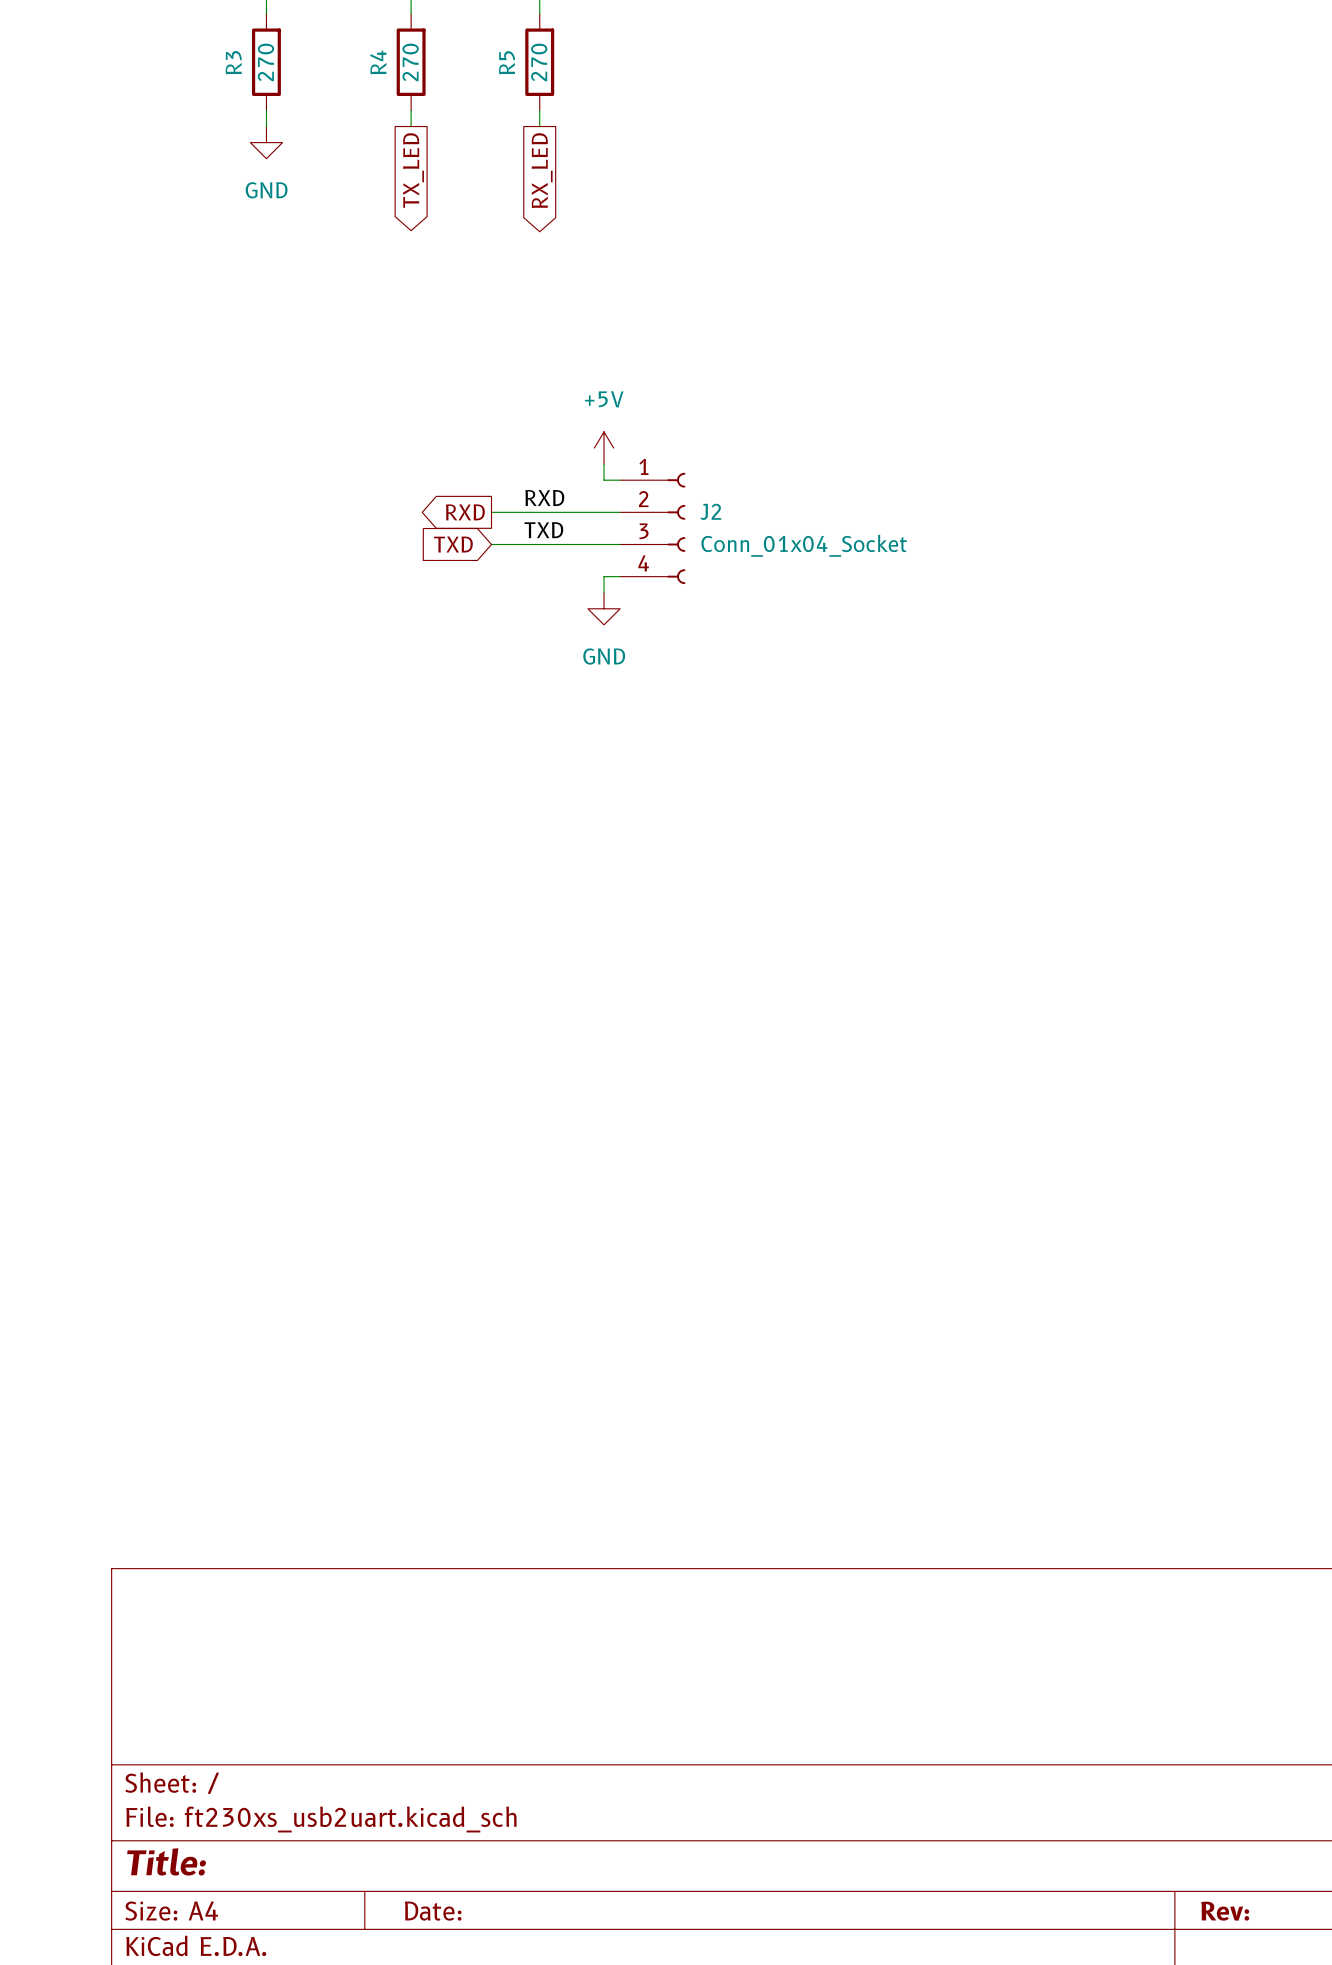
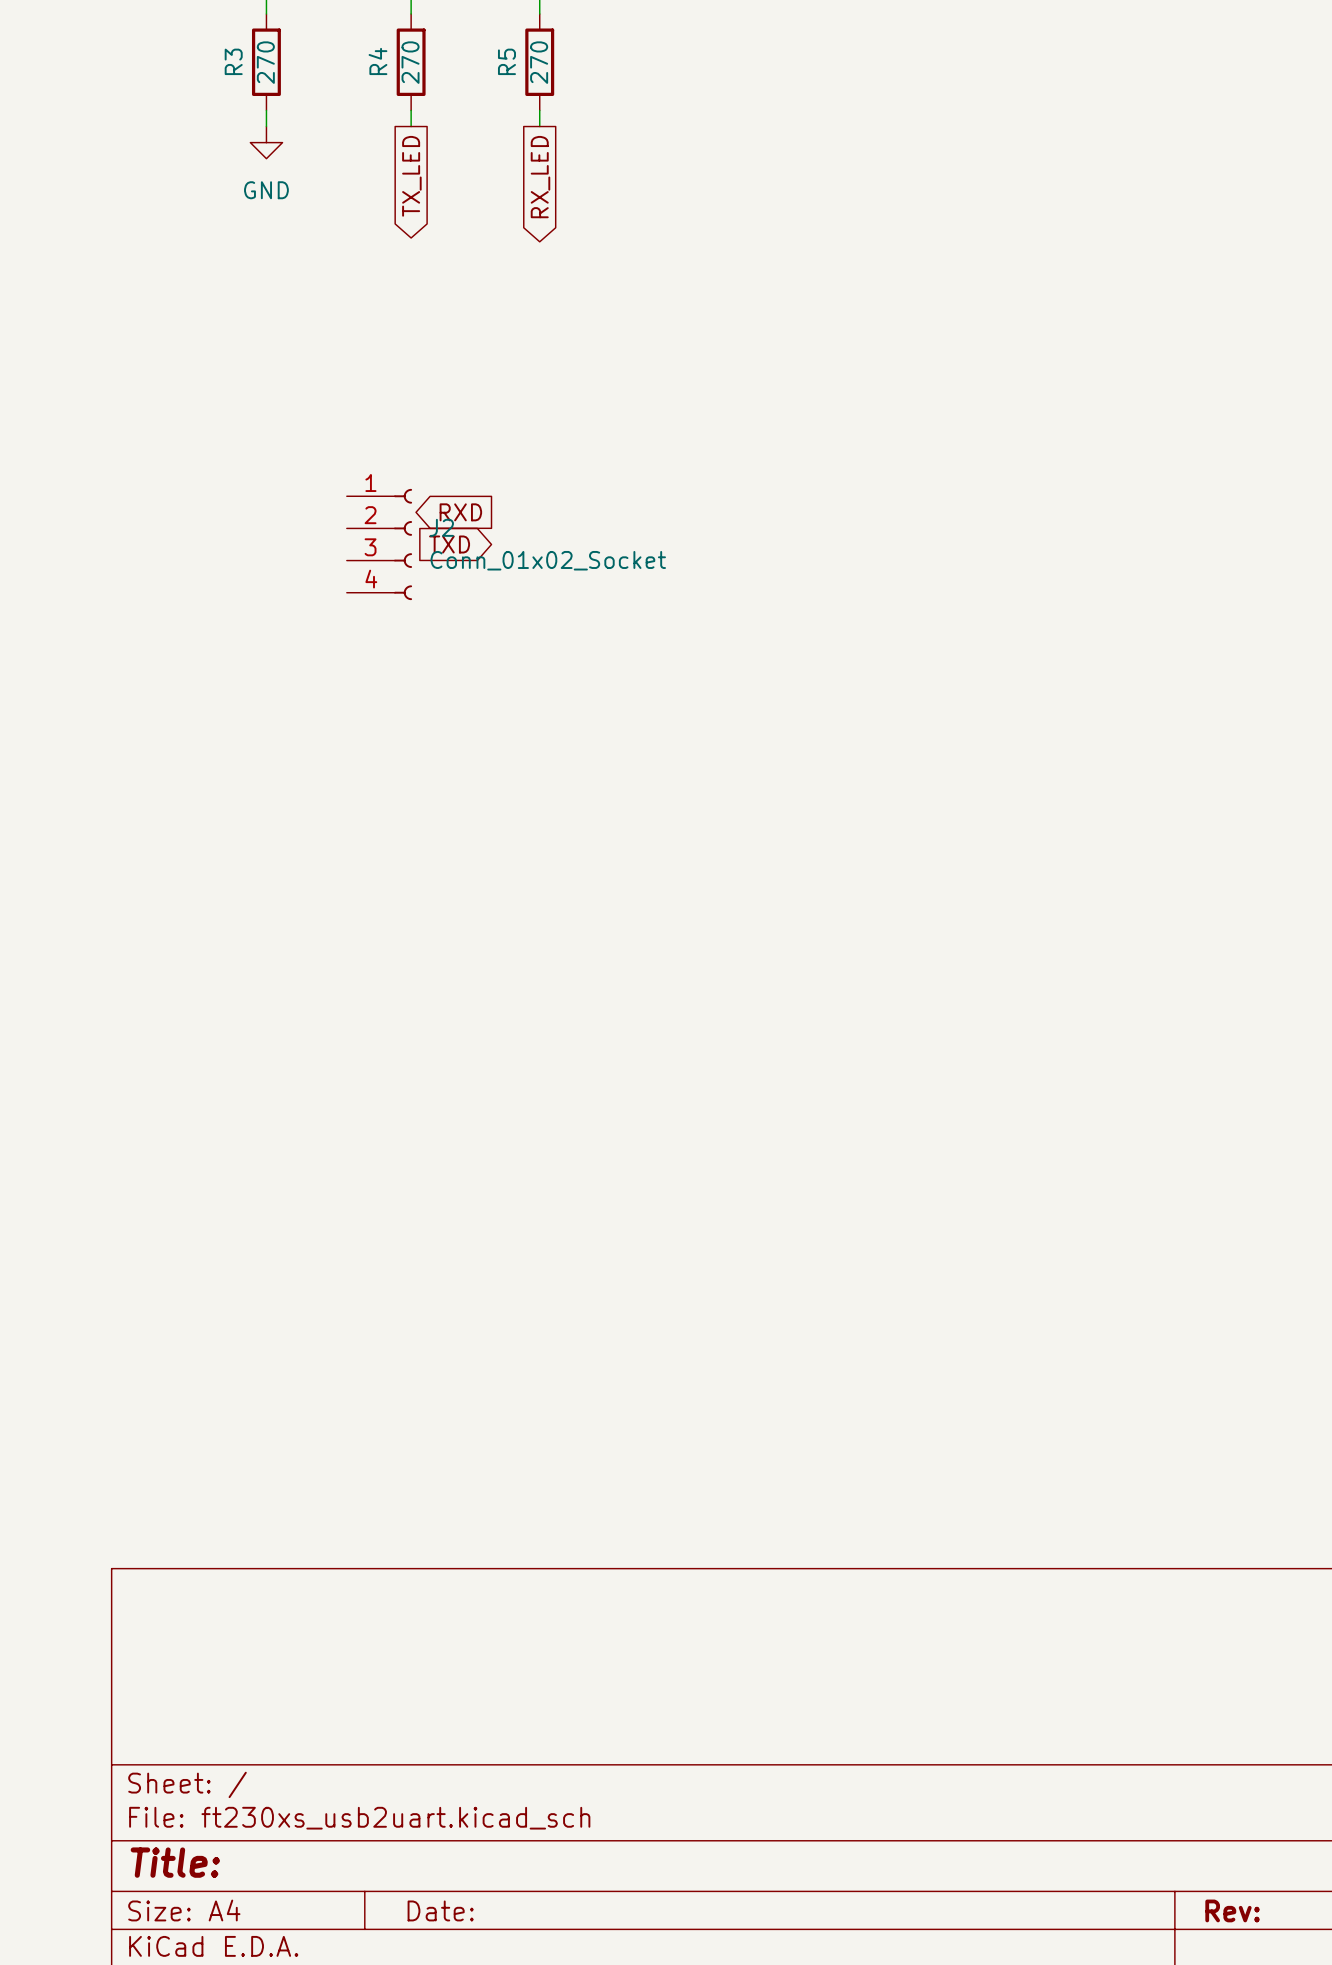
power symbol: +5V (604, 448) -> none
wire: (604, 464) (604, 480) (620, 480) -> none
label: RXD (544, 498) -> none
wire: (491, 512) (620, 512) -> none
J2 position: (652, 528) -> (379, 544)
label: TXD (543, 530) -> none
wire: (491, 544) (620, 544) -> none
J2 value: Conn_01x04_Socket (804, 545) -> Conn_01x02_Socket (548, 560)
wire: (620, 576) (604, 576) (604, 592) -> none
power symbol: GND (604, 608) -> none

